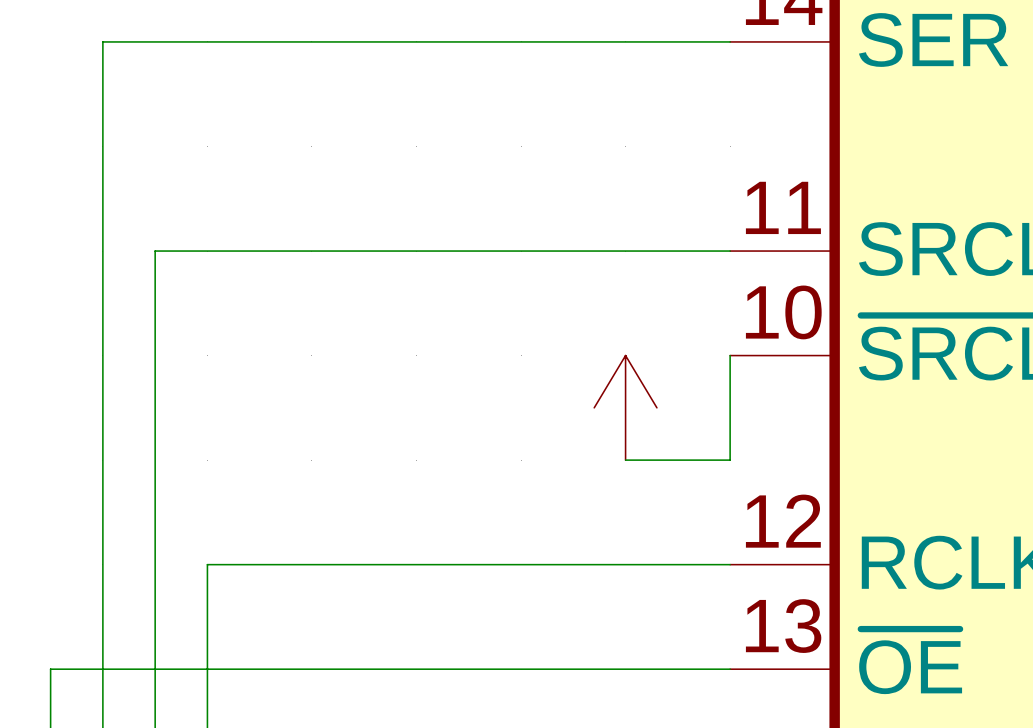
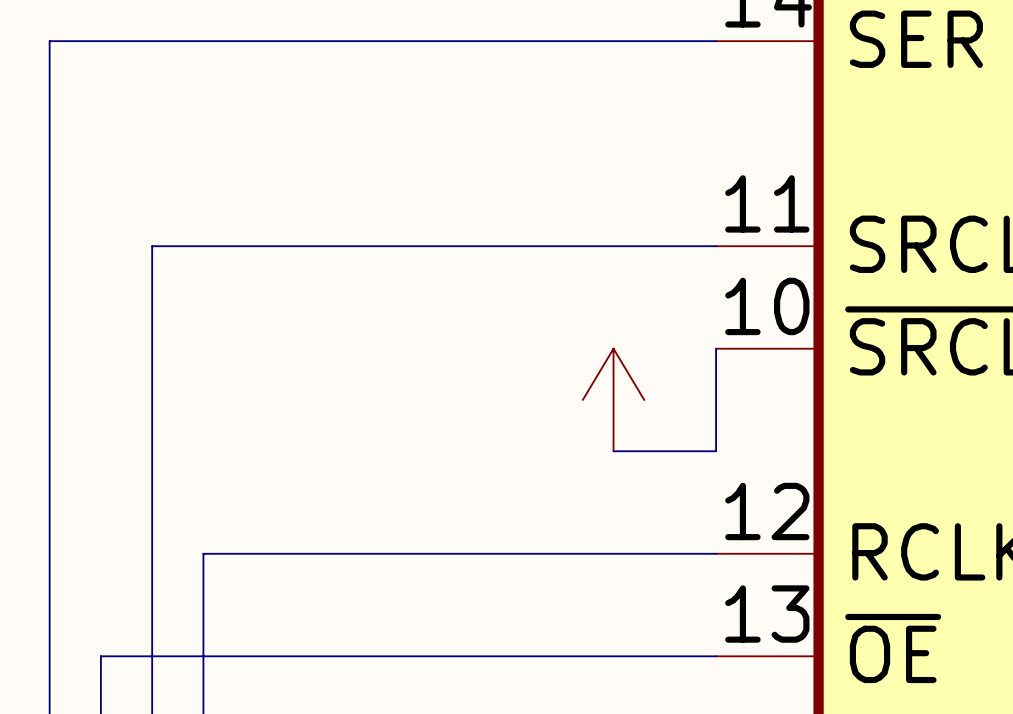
wire: (102, 41) (102, 669) (50, 669) -> (100, 41) (49, 41) (49, 656)

